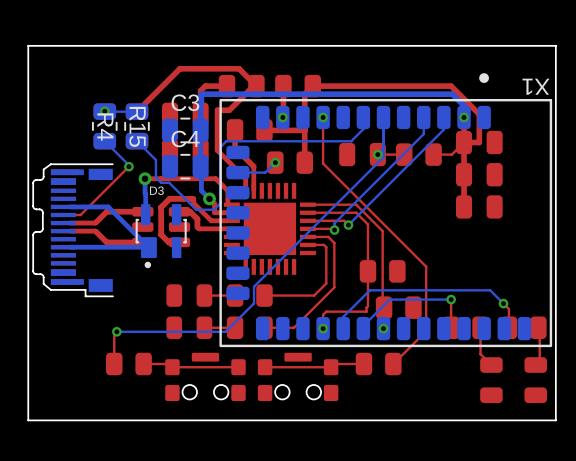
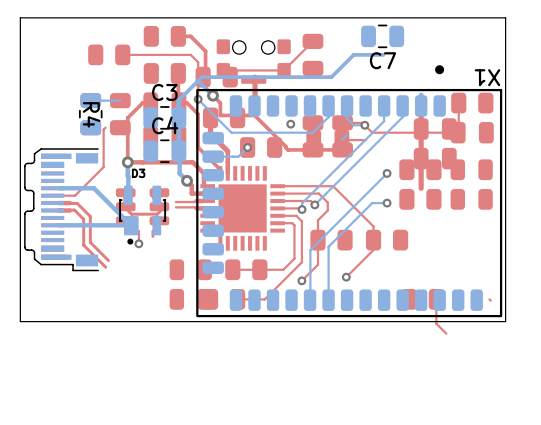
part: none -> (164, 36)
top track: none -> (178, 36) (190, 36) (205, 51) (205, 88) (220, 103) (220, 115) (254, 115) (288, 149) (342, 149)
board edge: (555, 45) (28, 45) -> (505, 40) (505, 17) (20, 17) (20, 40)
top track: none -> (312, 41) (284, 70)
top track: none -> (122, 54) (190, 54) (198, 62) (198, 99)
part: none -> (312, 54)
part: none -> (253, 61)
top track: none -> (284, 70) (223, 70)
part: none -> (164, 73)
top track: (227, 86) (205, 86) (200, 90) (200, 114) -> none
part: (298, 86) -> none
bottom track: none -> (198, 80) (212, 95)
bottom track: (464, 105) (452, 94) (201, 94) (200, 111) -> (383, 54) (353, 54) (331, 77) (201, 77) (178, 100)
via: none -> (212, 95)
via: none -> (198, 99)
via: (104, 111) -> none
top track: (137, 111) (179, 68) (239, 68) (256, 86) (253, 86) (229, 110) (217, 110) (217, 150) (245, 178) (245, 186) -> (178, 73) (178, 103) (187, 103) (198, 114) (198, 147) (220, 169)
top track: none -> (151, 103) (142, 103) (127, 117) (127, 162)
top track: none -> (458, 103) (458, 132) (372, 132) (362, 122) (342, 122)
part: none -> (472, 103)
via: (282, 117) -> none
top track: (323, 117) (323, 163) (426, 266) (426, 331) (393, 364) -> none
via position: (323, 117) -> (290, 124)
via: (464, 117) -> none
R15 side: bottom (137, 126) -> top (109, 54)
bottom track: (363, 129) (351, 141) (226, 141) (220, 147) (220, 203) (214, 209) (196, 209) (169, 182) (161, 182) (155, 177) (155, 160) (137, 141) -> (328, 116) (312, 132) (231, 132) (198, 99)
top track: (304, 130) (264, 130) -> none
bottom track: (383, 131) (383, 157) (254, 286) (254, 303) (225, 331) (116, 331) -> (347, 118) (353, 125) (364, 125)
via: none -> (364, 125)
bottom track: (104, 141) (128, 166) -> none
part: none -> (472, 132)
part: none -> (312, 136)
part: none -> (342, 136)
via: (377, 154) -> none
part: (418, 154) -> none
top track: (433, 154) (451, 154) (464, 142) (479, 142) (479, 114) (451, 86) (312, 86) (304, 94) (304, 162) -> none
top track: (128, 166) (80, 215) -> (105, 127) (103, 129) (103, 167) (75, 195) (68, 195)
via: (128, 166) -> none
part: none -> (420, 169)
part: none -> (471, 169)
via: none -> (387, 173)
top track: (356, 204) (382, 231) (384, 328) -> (322, 186) (333, 186) (373, 226) (373, 249) (346, 277)
C7 side: top (479, 206) -> bottom (382, 36)
top track: (142, 211) (106, 211) (95, 223) (82, 223) -> (108, 260) (90, 242) (90, 216) (77, 203) (69, 203)
top track: (179, 211) (190, 211) (197, 219) (199, 228) (219, 228) -> (175, 207) (196, 208)
top track: (352, 212) (356, 212) (367, 224) (367, 306) (366, 311) (326, 311) (323, 314) (323, 328) -> (318, 193) (327, 202) (327, 210) (317, 220) (317, 264) (301, 280)
top track: none -> (124, 197) (124, 207) (131, 214) (157, 214) (164, 206)
part: none -> (420, 199)
part: none -> (471, 199)
top track: (219, 220) (211, 220) (193, 202) (193, 198) (169, 198) (161, 207) (161, 234) (168, 242) (179, 242) -> (196, 201) (175, 202)
via: none -> (387, 203)
top track: (82, 231) (95, 231) (106, 242) (142, 242) -> (69, 210) (74, 210) (83, 219) (83, 245) (105, 267)
top track: none -> (138, 231) (138, 243)
top track: none -> (152, 231) (152, 236)
part: none -> (387, 240)
via: none -> (138, 243)
part position: (382, 271) -> (331, 240)
part: (189, 295) -> none
part: none -> (190, 269)
top track: (228, 295) (204, 295) -> none
part position: (249, 295) -> (246, 269)
top track: (451, 299) (451, 327) -> none
bottom track: (451, 299) (389, 299) (363, 325) -> (387, 203) (372, 203) (328, 246) (328, 297)
via: (451, 299) -> none
top track: (503, 303) (508, 309) (508, 327) -> none
bottom track: (503, 303) (490, 290) (369, 290) (343, 316) (343, 328) -> (387, 173) (310, 250) (310, 300)
via: (503, 303) -> none
part: (398, 307) -> none
part: (189, 327) -> none
part: none -> (190, 299)
top track: (228, 327) (204, 327) -> none
part: (523, 327) -> none
via position: (323, 328) -> (301, 280)
via position: (383, 328) -> (346, 277)
top track: (539, 329) (539, 365) -> none
top track: (116, 331) (114, 334) (114, 364) -> none
via: (116, 331) -> none
board edge: (555, 351) (555, 420) (28, 420) (28, 351) -> (505, 321) (20, 321)
part: (128, 364) -> none
top track: (143, 364) (169, 364) (172, 367) (238, 367) -> none
top track: (363, 364) (334, 364) (331, 367) (265, 367) -> none
part: (378, 364) -> none
part: (205, 376) -> none
part: (298, 376) -> none
part: (491, 380) -> none
part: (535, 380) -> none

